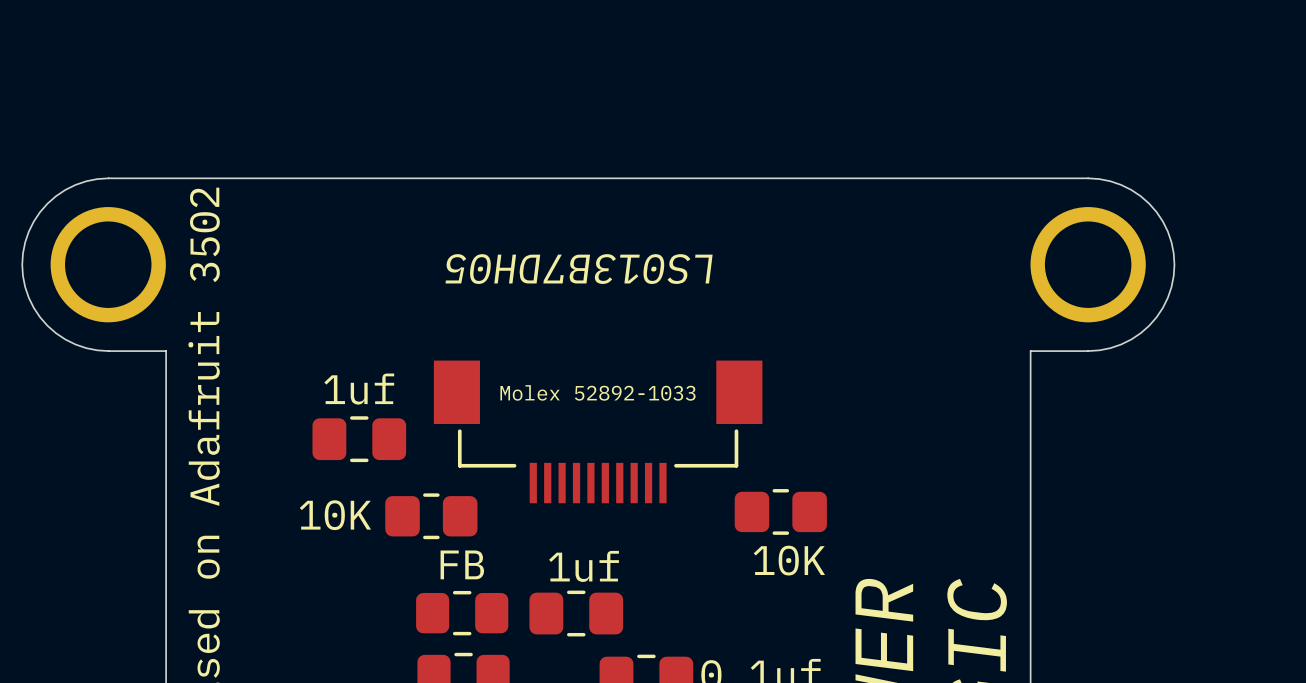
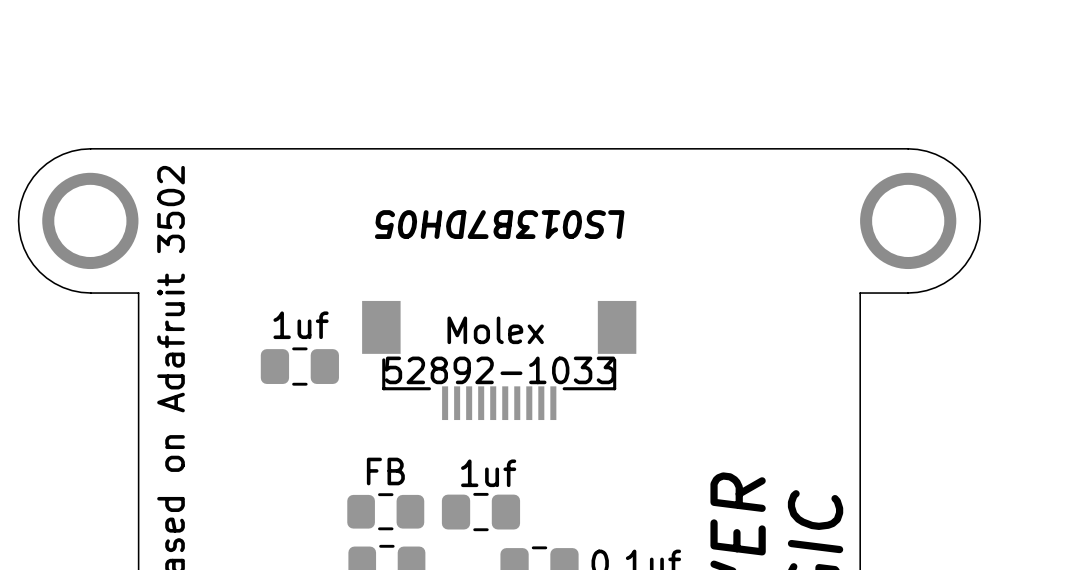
part text: Molex 52892-1033 (597, 392) -> none
text: none -> Molex (495, 330)
part text: none -> 52892-1033 (500, 370)
part: 10K (780, 511) -> none
part: 10K (431, 516) -> none

